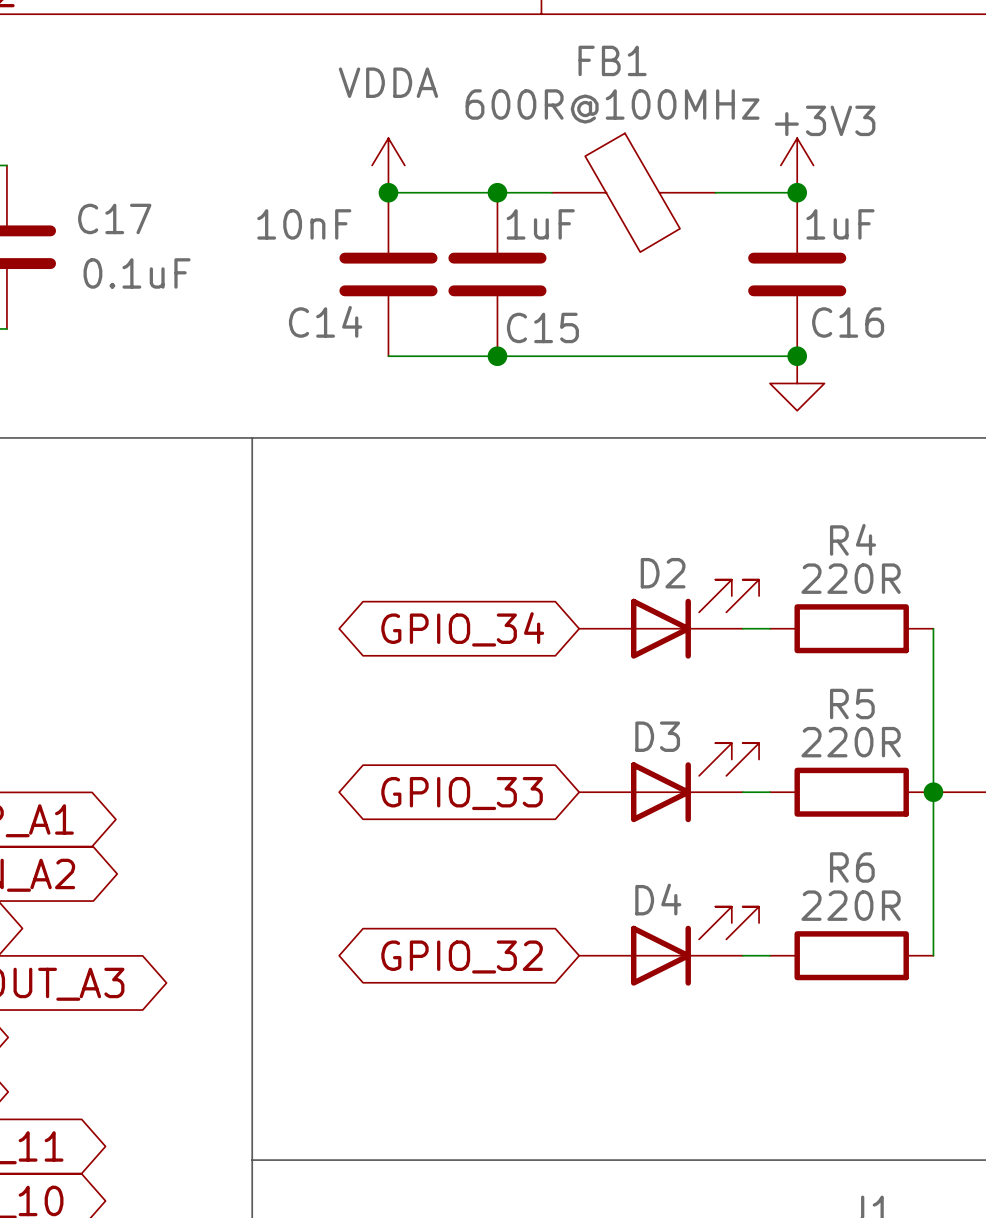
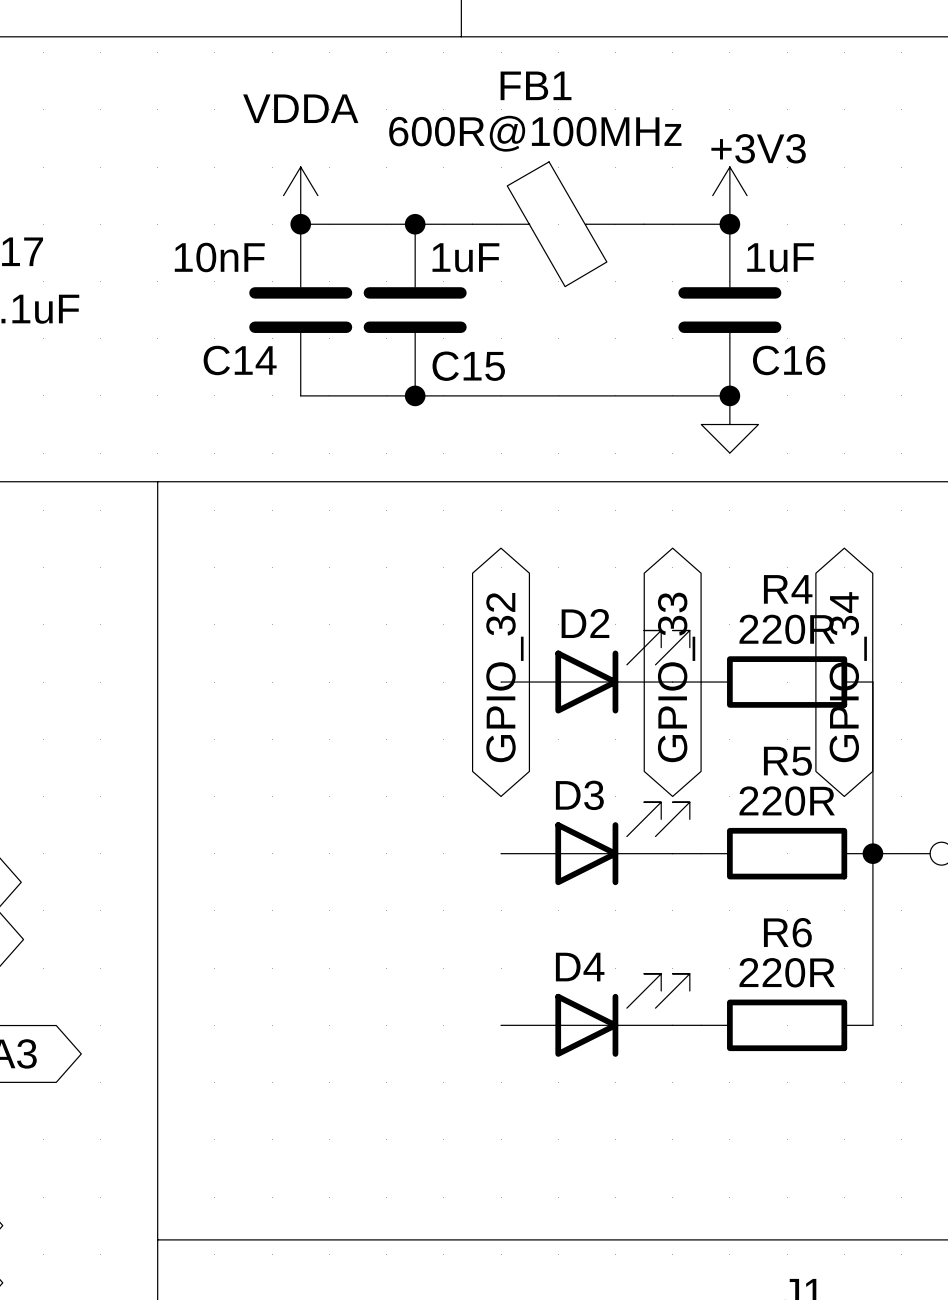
global label rotation: 0° (462, 629) -> 90° clockwise (848, 677)
global label position: GPIO_34 (462, 629) -> GPIO_34 (848, 677)
global label rotation: 0° (462, 793) -> 90° clockwise (676, 677)
global label position: GPIO_33 (462, 793) -> GPIO_33 (676, 677)
global label rotation: 0° (462, 957) -> 90° clockwise (504, 677)
global label position: GPIO_32 (462, 957) -> GPIO_32 (504, 677)

